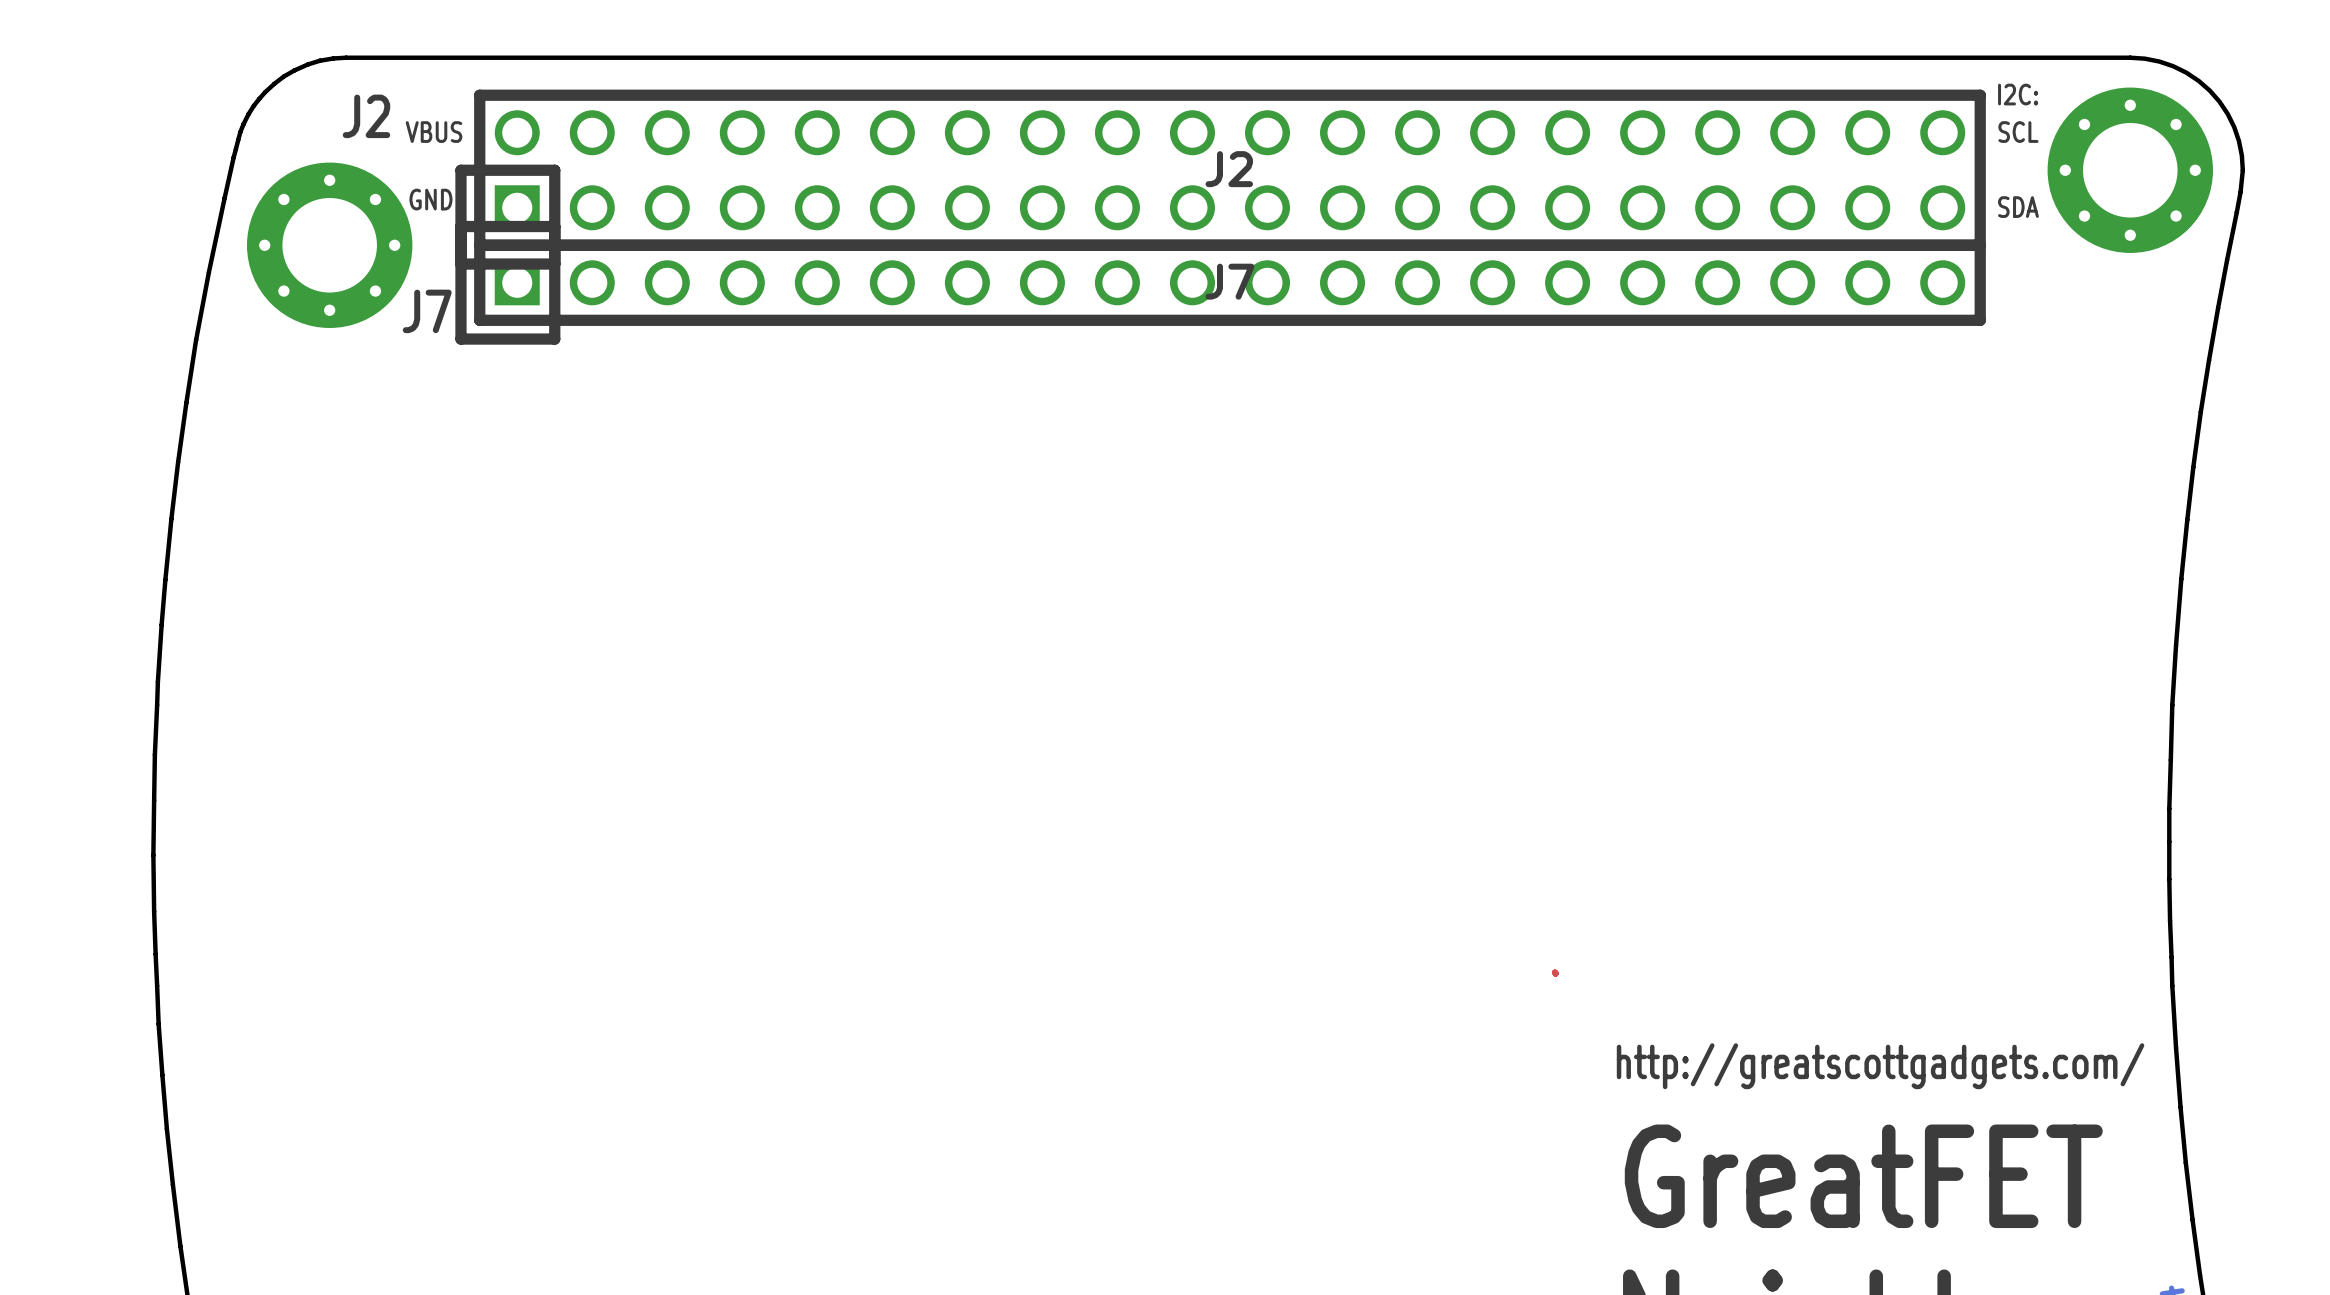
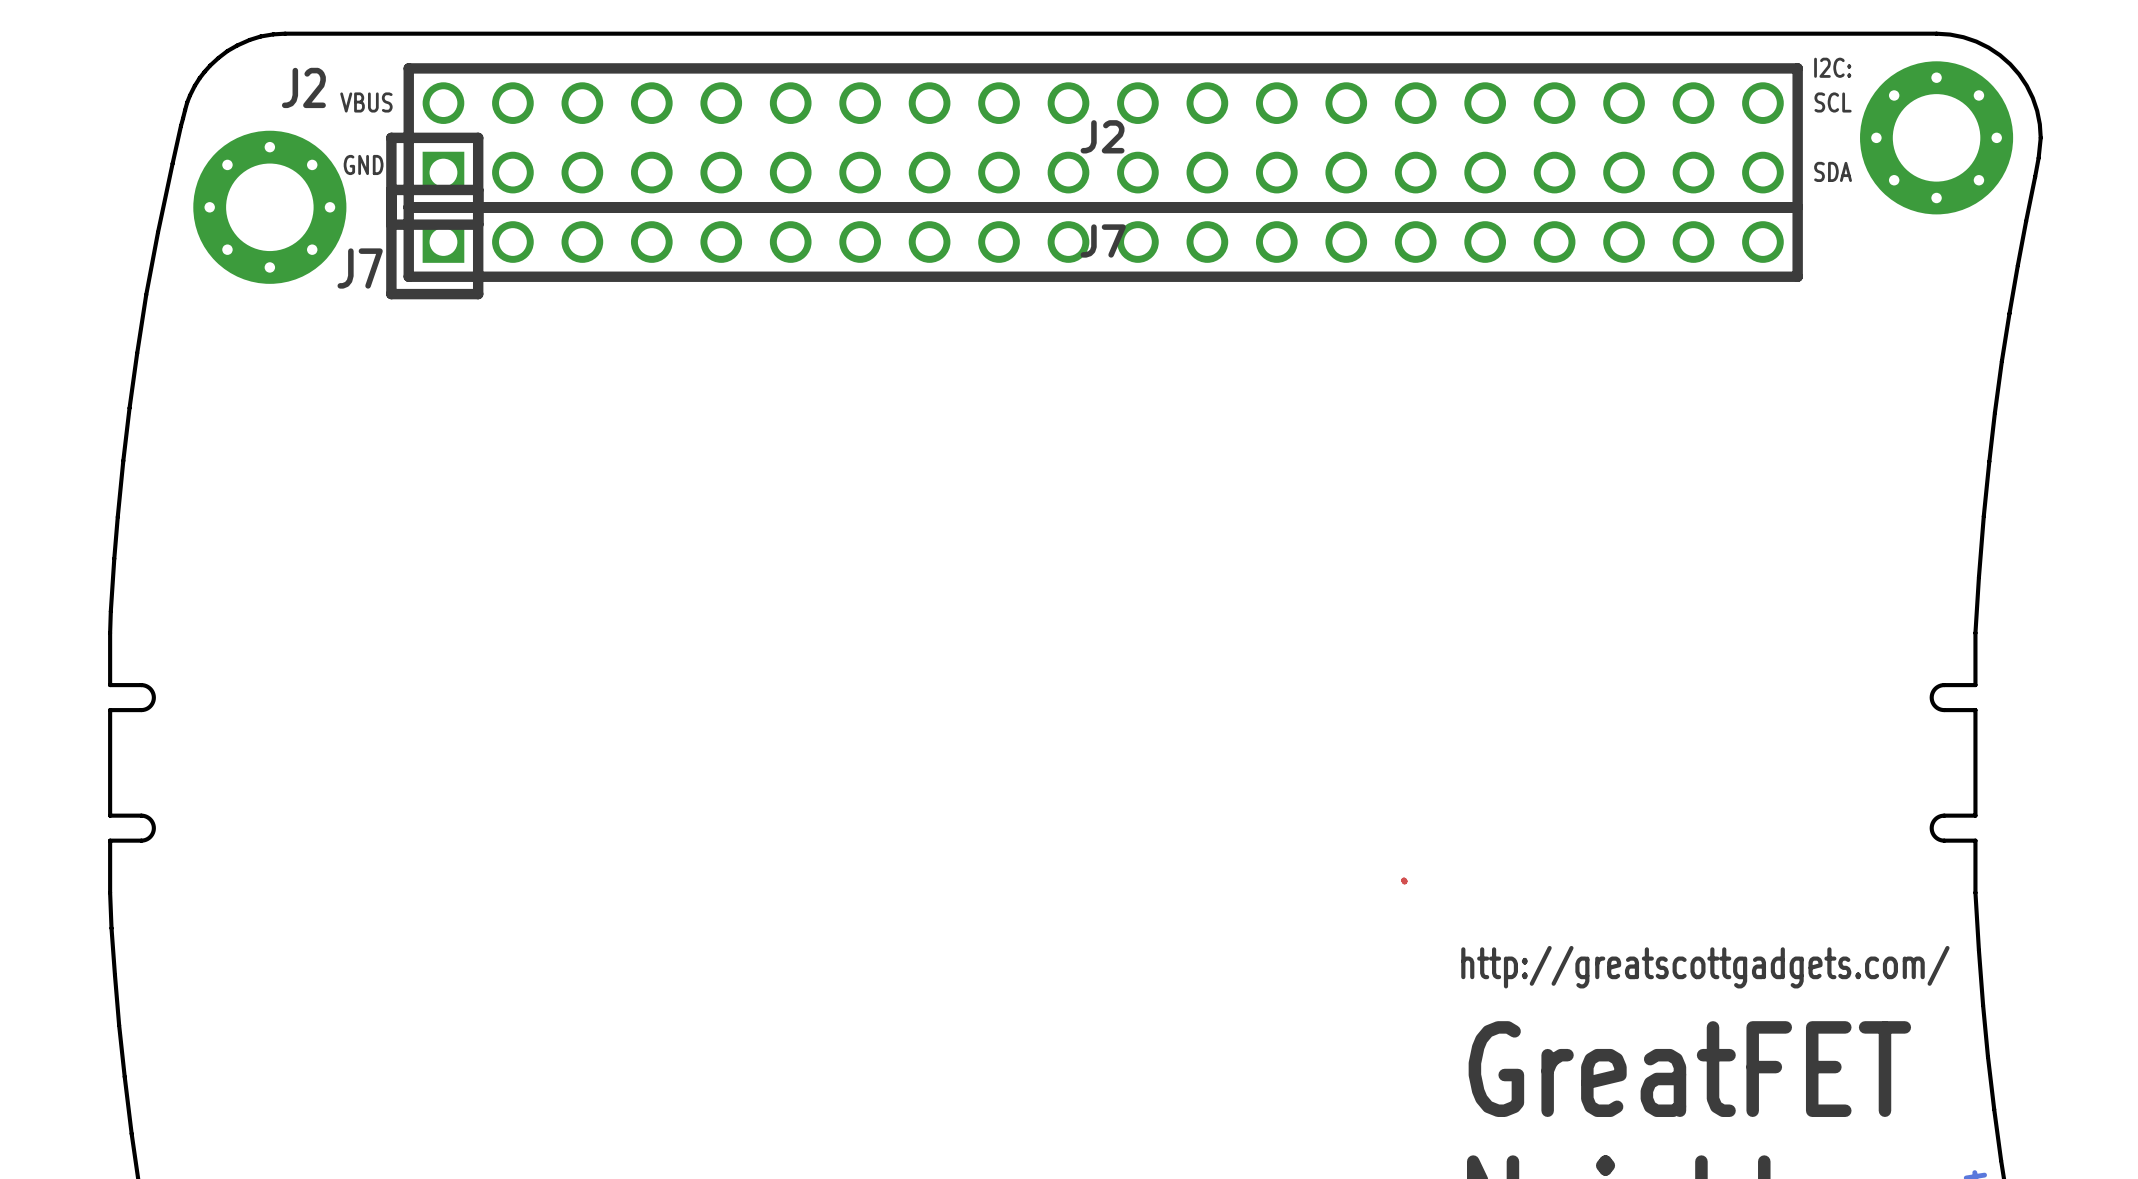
board edge: (157, 705) (153, 855) (157, 985) -> (110, 633) (110, 685) (144, 685) (151, 689) (153, 697) (151, 705) (144, 709) (110, 710) (110, 815) (144, 816) (151, 820) (153, 828) (151, 835) (144, 840) (110, 840) (110, 892)
board edge: (2172, 705) (2169, 808) (2172, 985) -> (1975, 633) (1975, 685) (1940, 685) (1934, 689) (1931, 697) (1934, 705) (1940, 709) (1975, 710) (1975, 815) (1940, 816) (1934, 820) (1931, 828) (1934, 835) (1940, 840) (1975, 840) (1975, 892)

